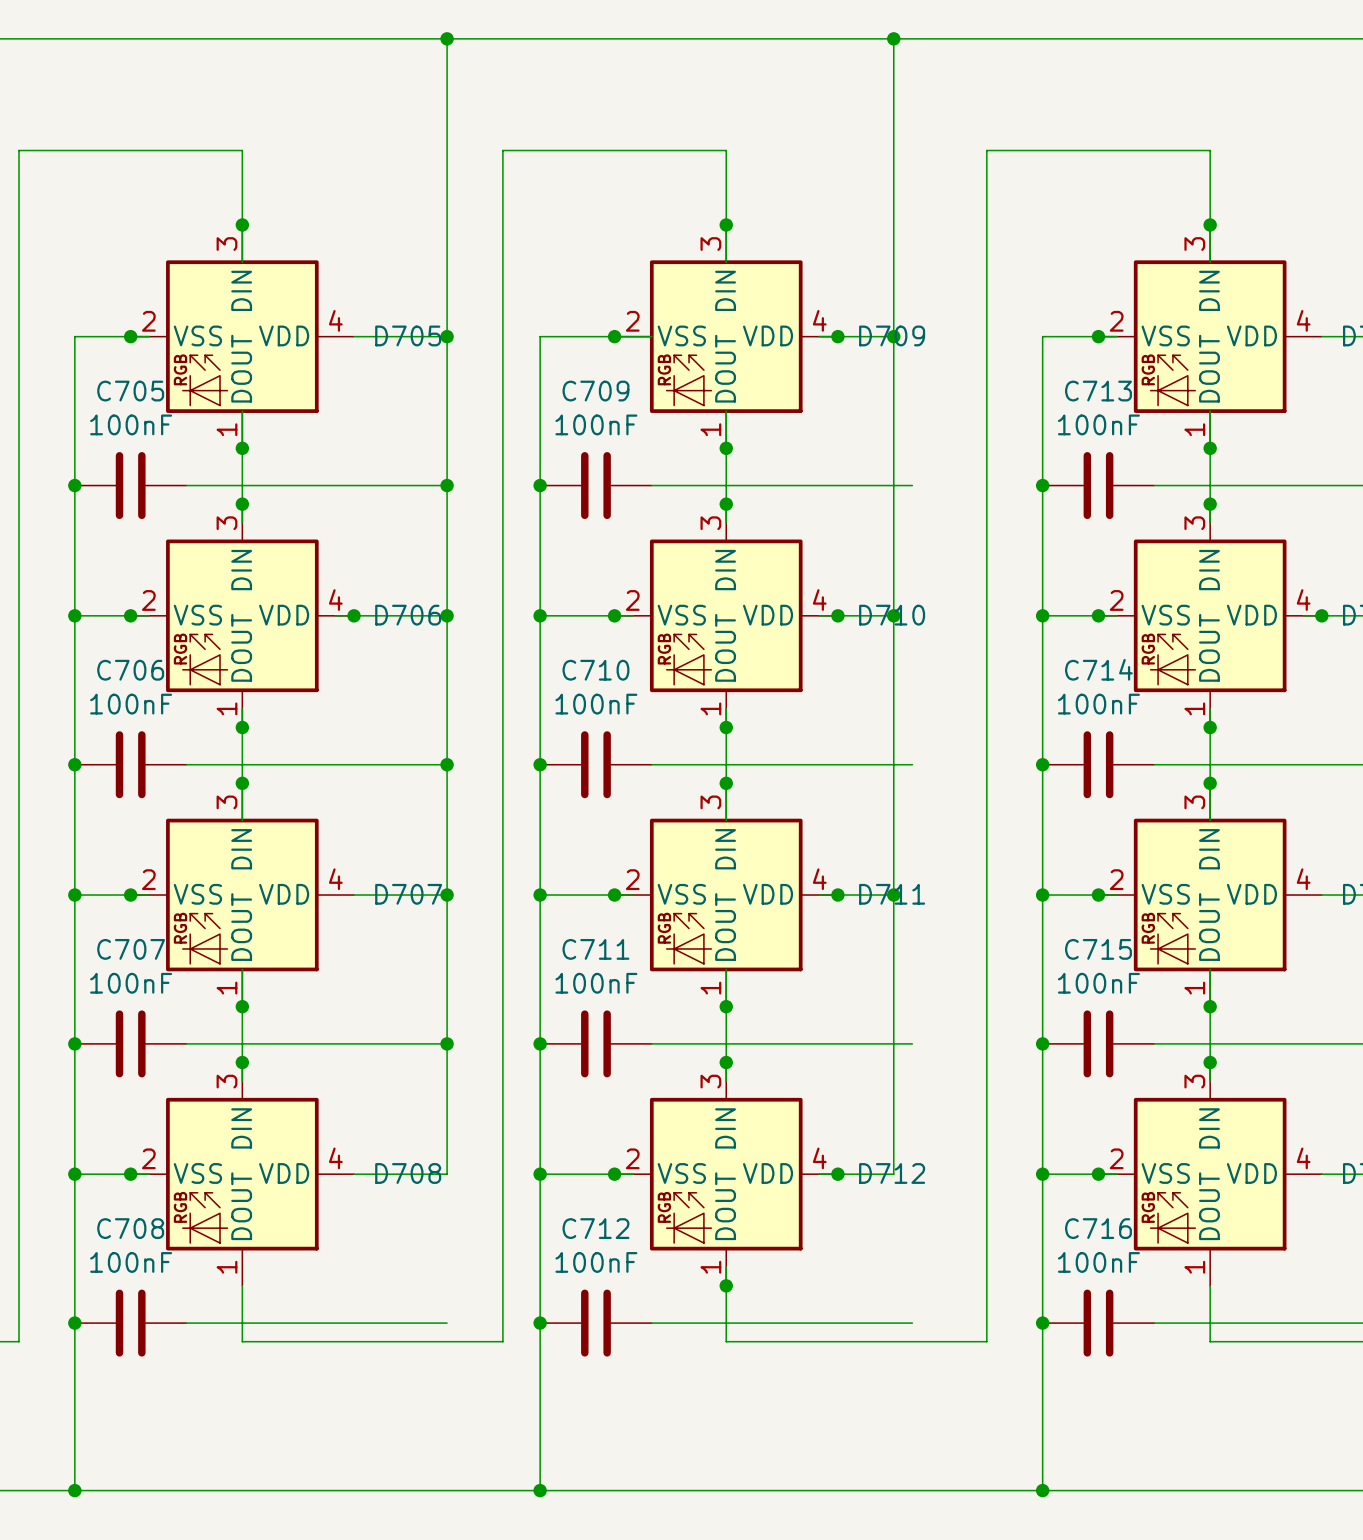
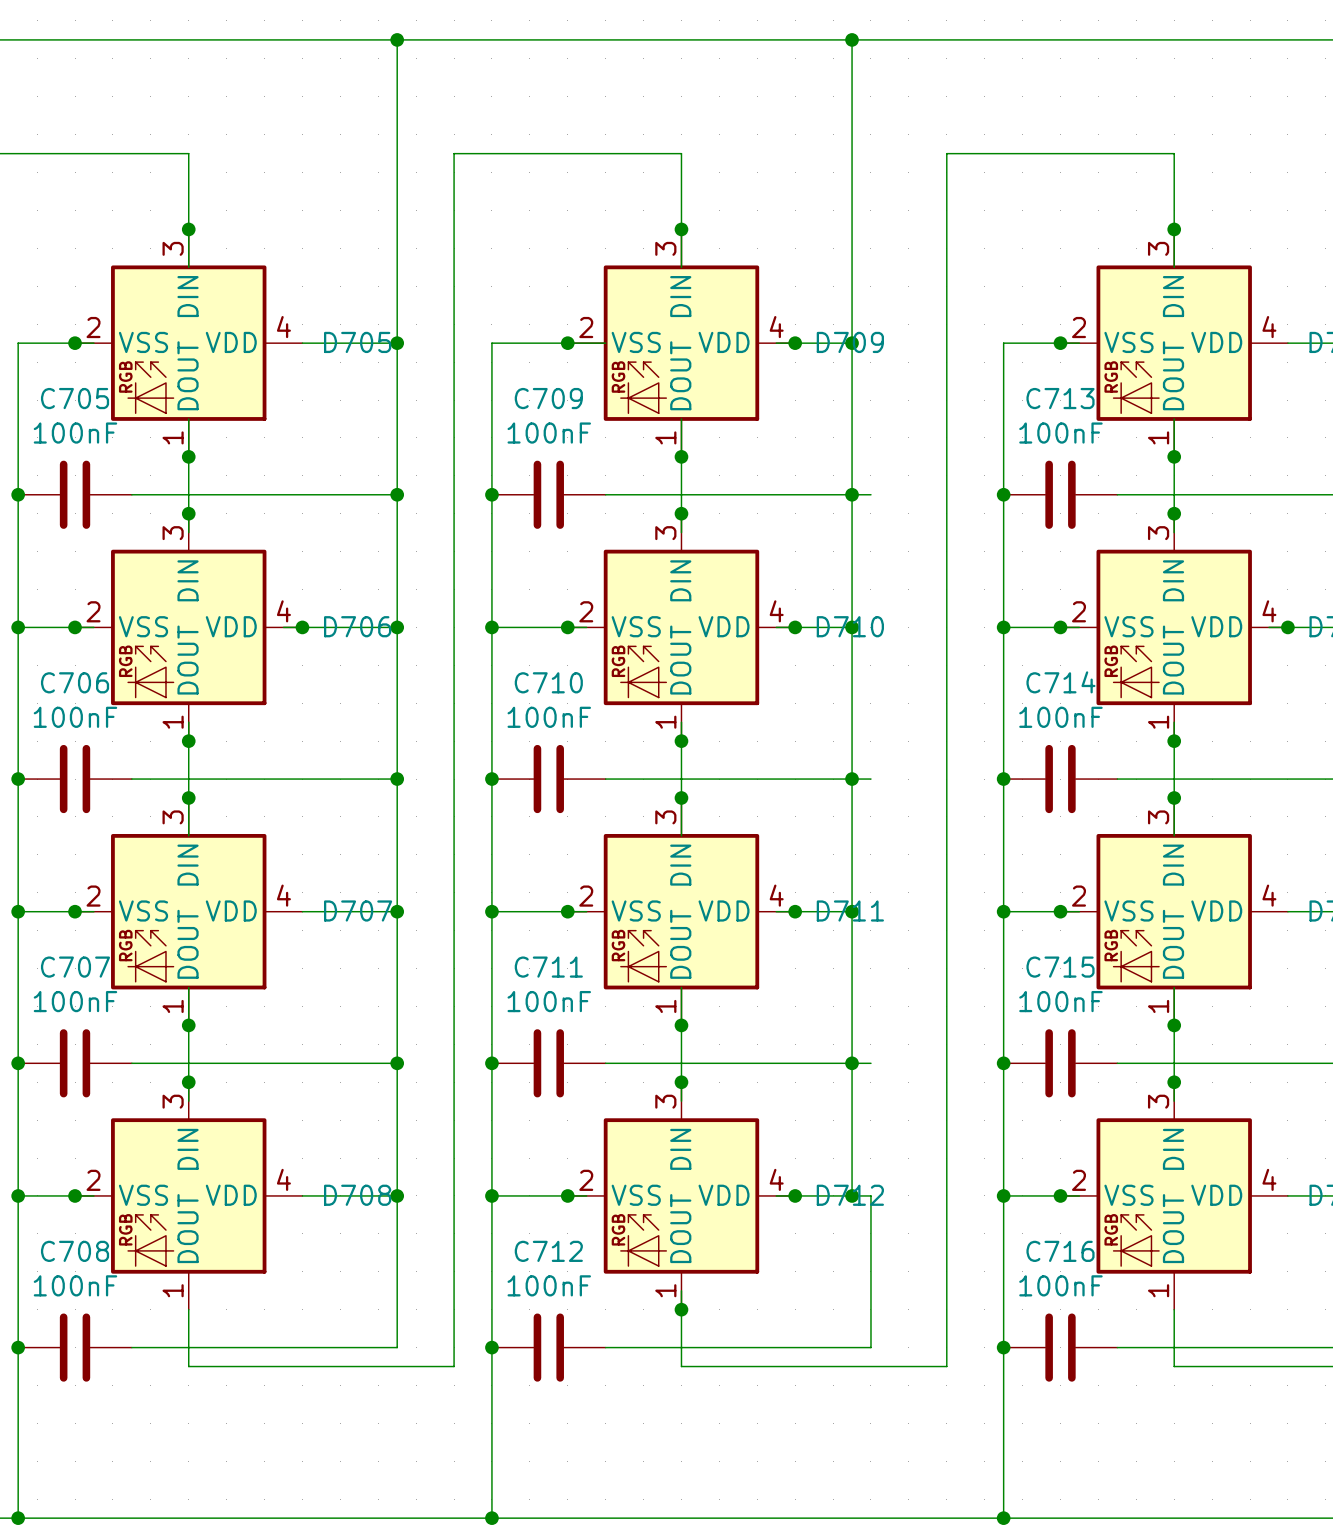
junction: none -> (852, 494)
junction: none -> (852, 779)
junction: none -> (852, 1063)
wire: none -> (397, 1195) (397, 1347)
junction: none -> (397, 1195)
wire: none -> (852, 1195) (870, 1195) (870, 1347)
junction: none -> (852, 1195)

